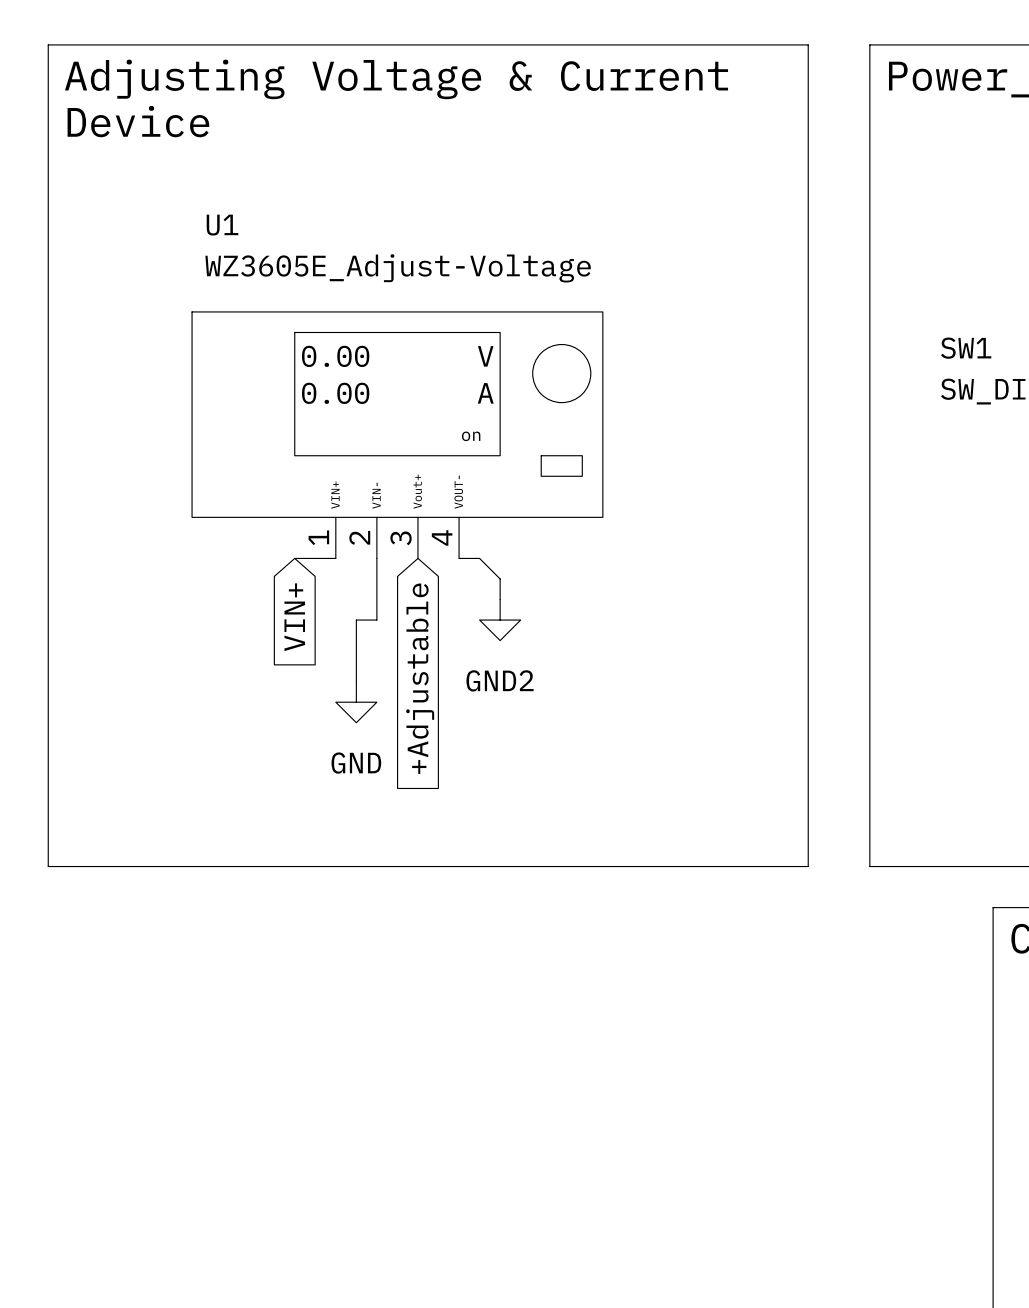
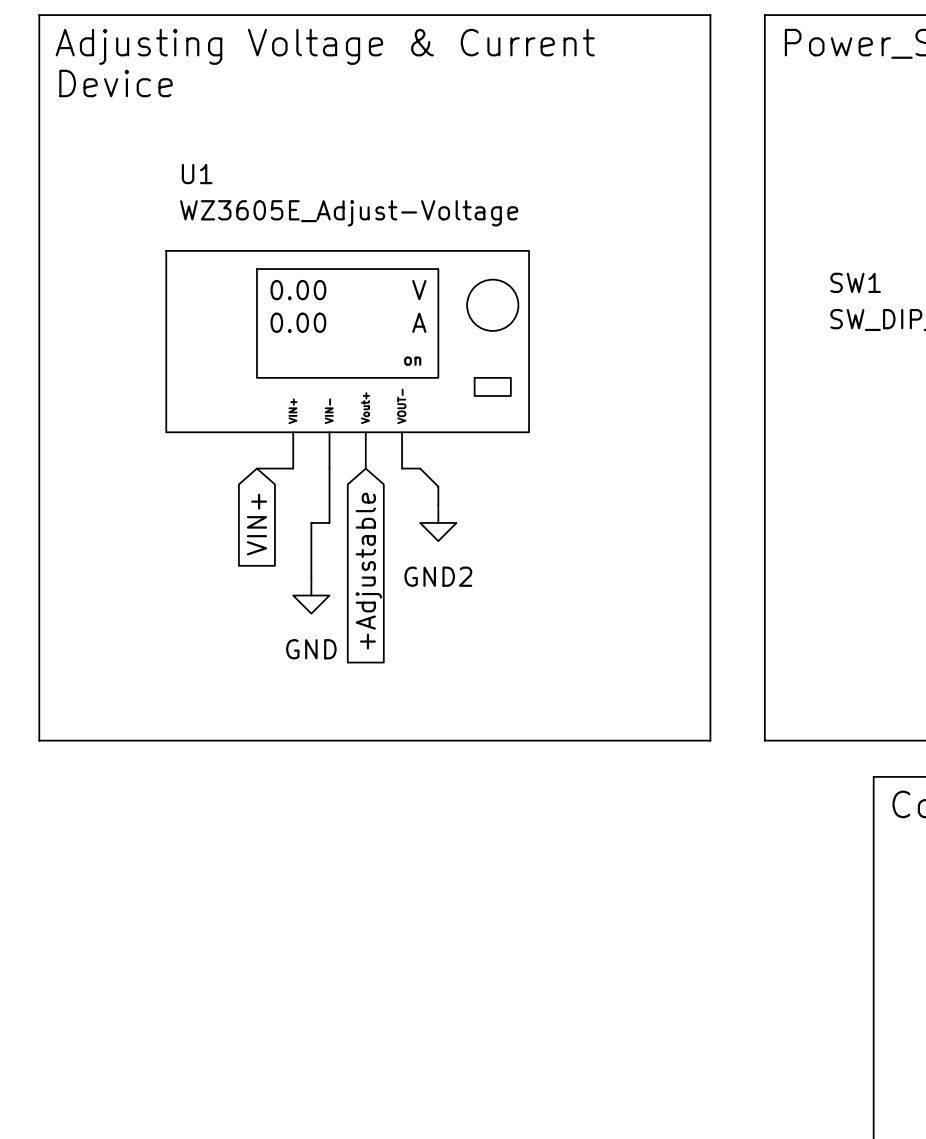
U1 pin number: 1 (318, 537) -> none
U1 pin number: 2 (359, 537) -> none
U1 pin number: 4 (442, 537) -> none
U1 pin number: 3 (401, 538) -> none

